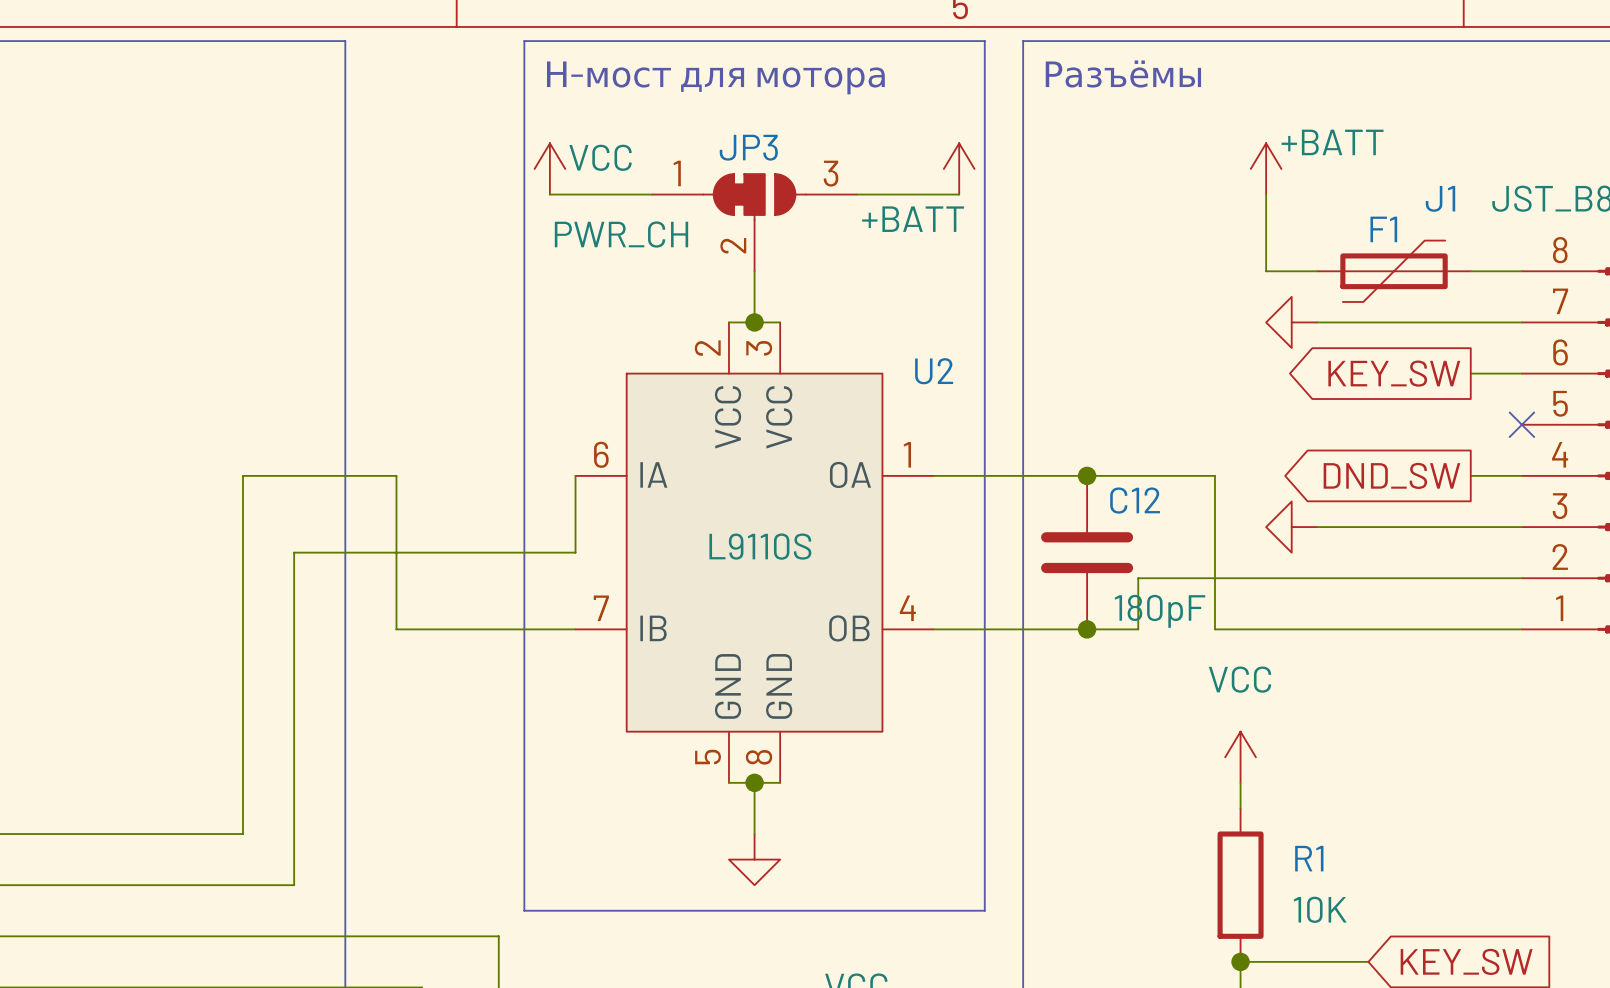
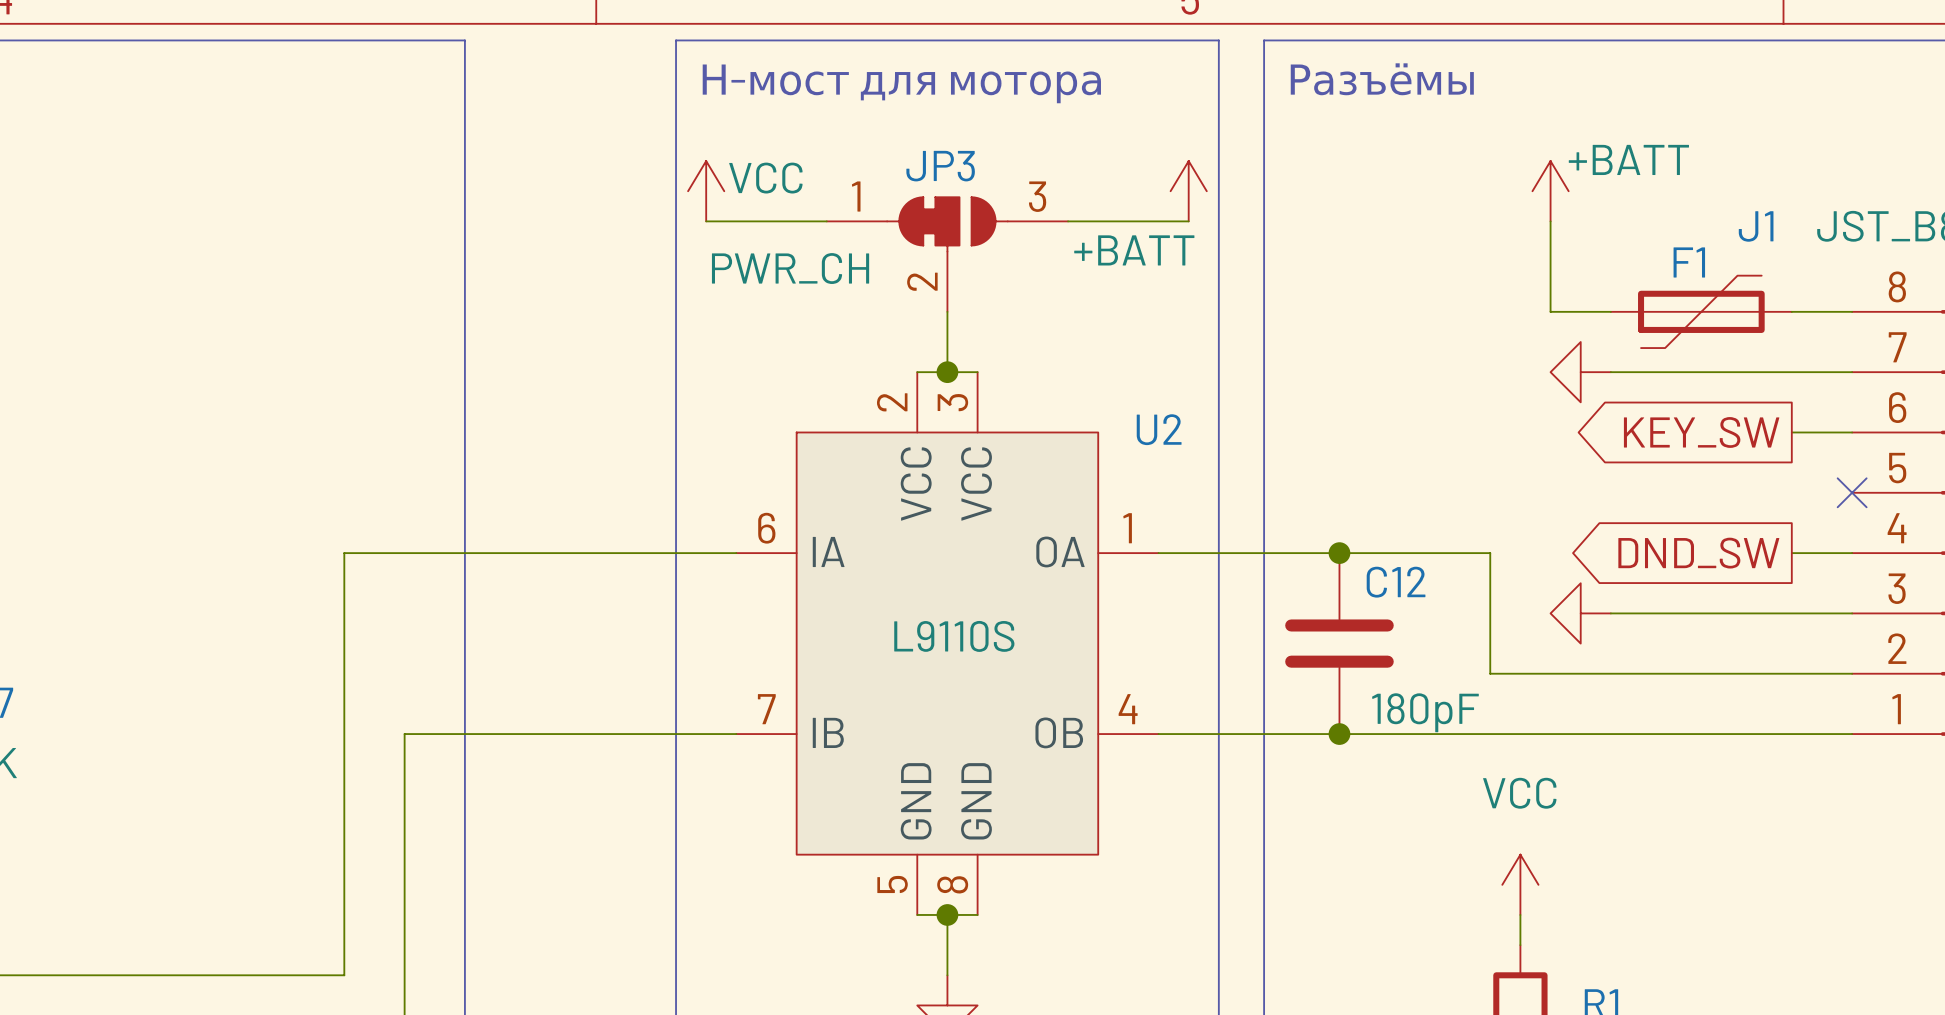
wire: (396, 475) (396, 629) -> (404, 734) (525, 734)
wire: (575, 475) (575, 552) (294, 552) (294, 629) -> (736, 553) (525, 553)
wire: (1138, 629) (1138, 578) (1214, 578) (1214, 629) -> (1399, 734) (1490, 734)

